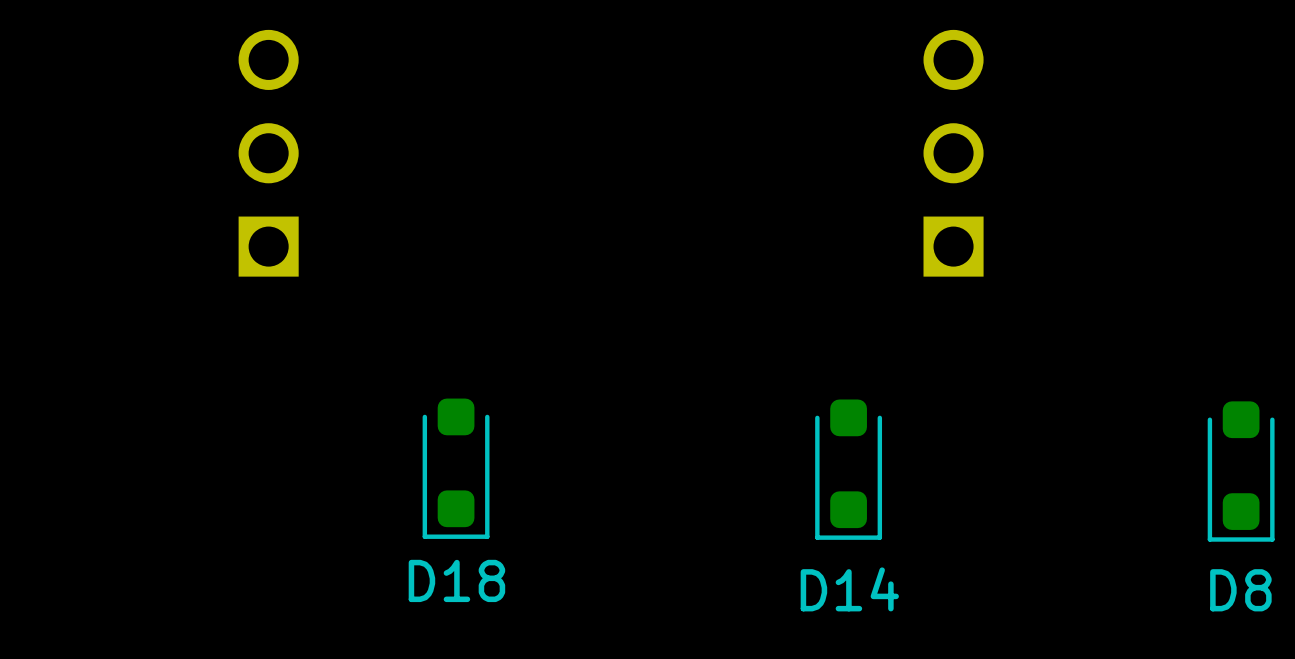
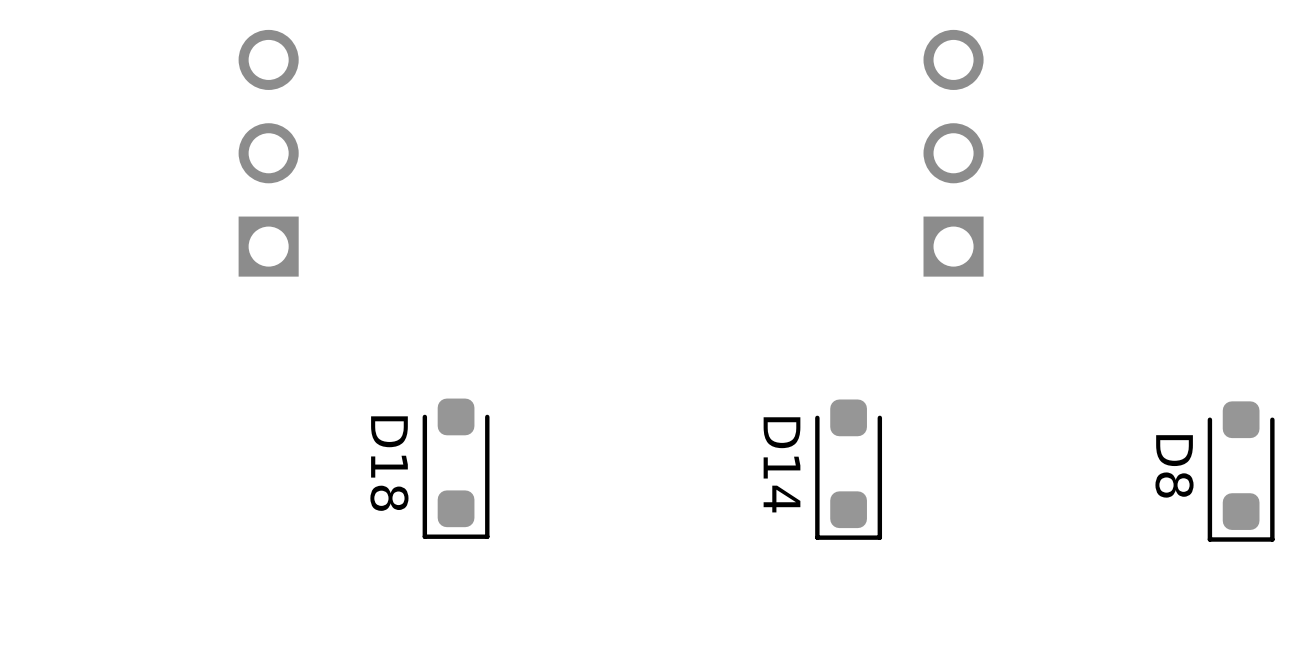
D18 name rotation: 0° (456, 580) -> 90° clockwise (389, 463)
D18 name position: D18 (456, 580) -> D18 (389, 463)
D14 name rotation: 0° (849, 589) -> 90° clockwise (781, 464)
D14 name position: D14 (849, 589) -> D14 (781, 464)
D8 name rotation: 0° (1240, 590) -> 90° clockwise (1174, 466)
D8 name position: D8 (1240, 590) -> D8 (1174, 466)

